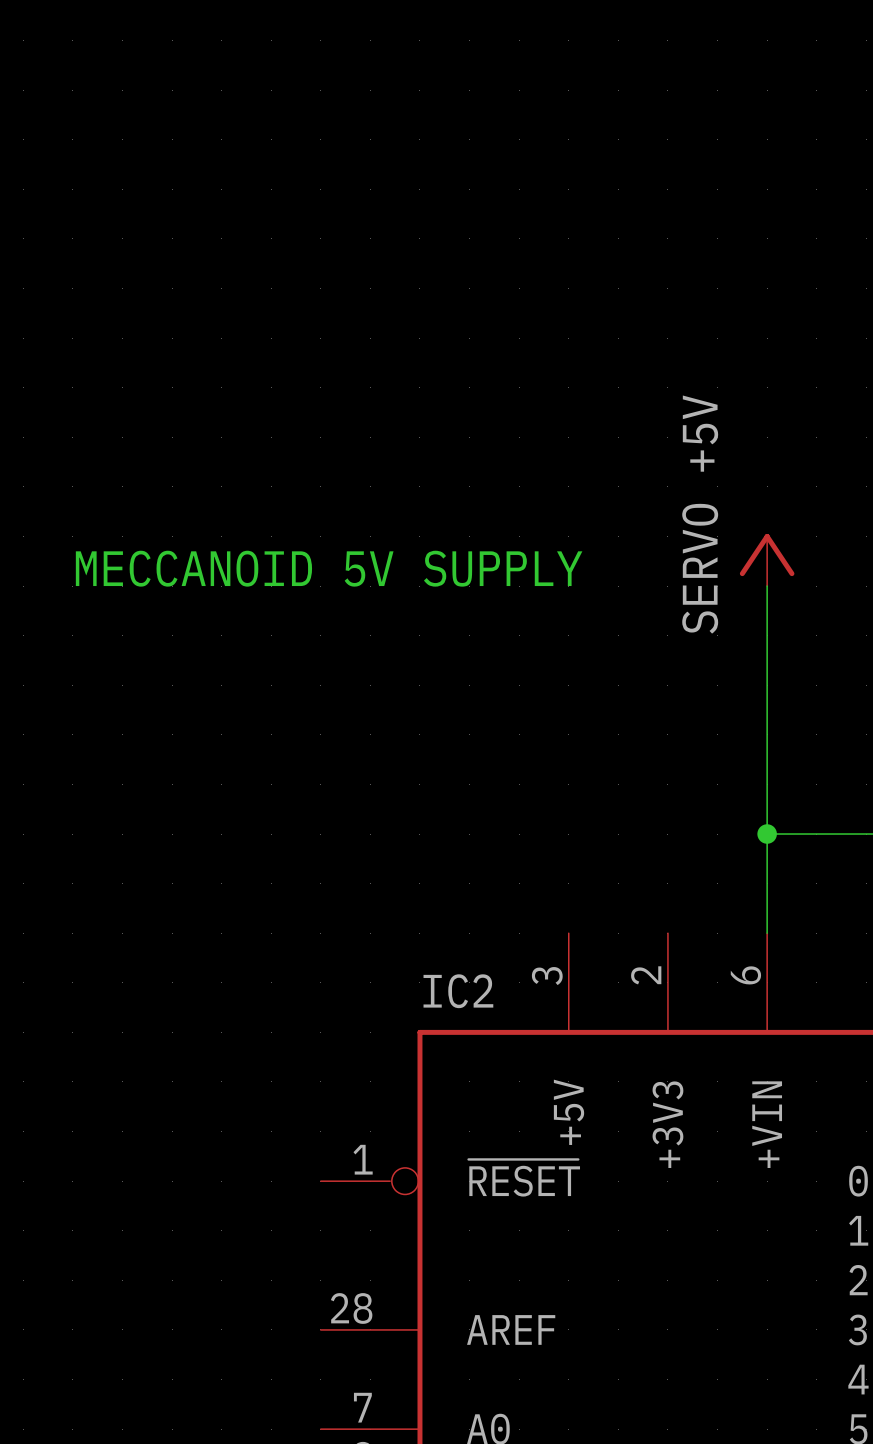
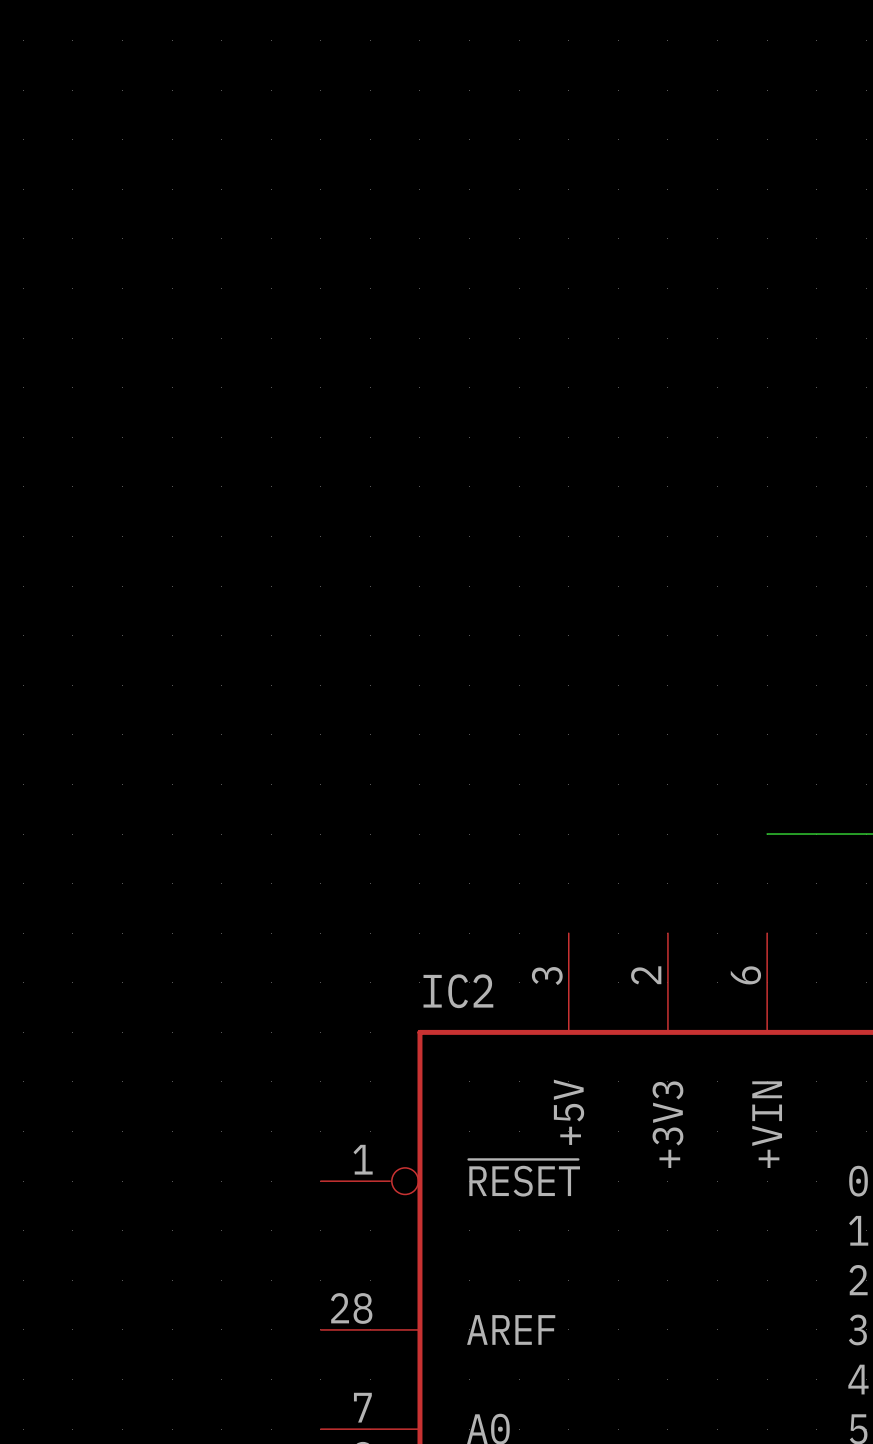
power symbol: SERVO +5V (767, 560) -> none
text: MECCANOID 5V SUPPLY (329, 568) -> none
wire: (767, 586) (767, 933) -> none
junction: (767, 834) -> none

